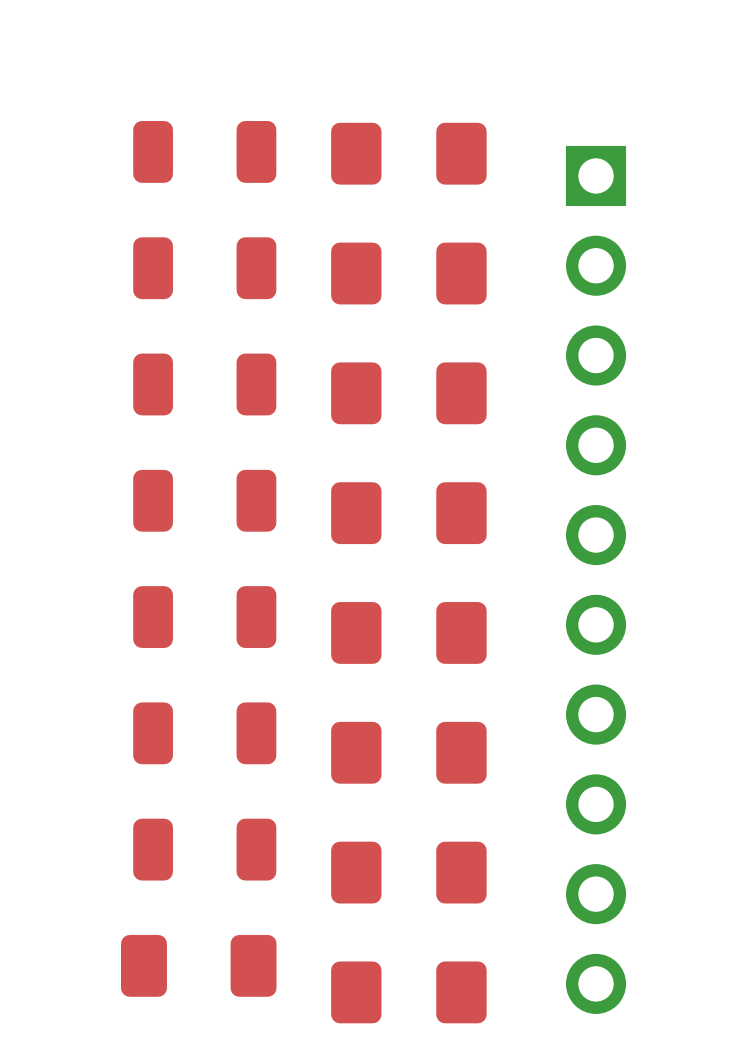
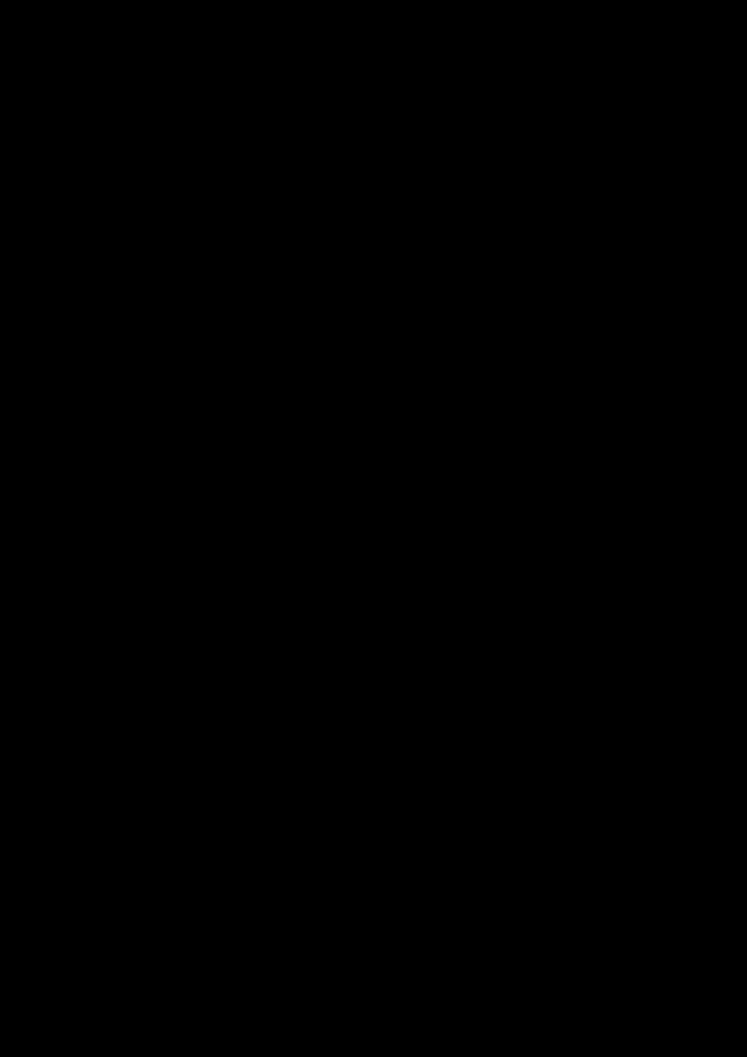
part: (204, 151) -> none
part: (408, 153) -> none
part: (204, 268) -> none
part: (408, 273) -> none
part: (204, 384) -> none
part: (408, 393) -> none
part: (204, 500) -> none
part: (408, 513) -> none
part: (596, 579) -> none
part: (204, 617) -> none
part: (408, 632) -> none
part: (204, 733) -> none
part: (408, 752) -> none
part: (204, 849) -> none
part: (408, 872) -> none
part: (198, 965) -> none
part: (408, 992) -> none

